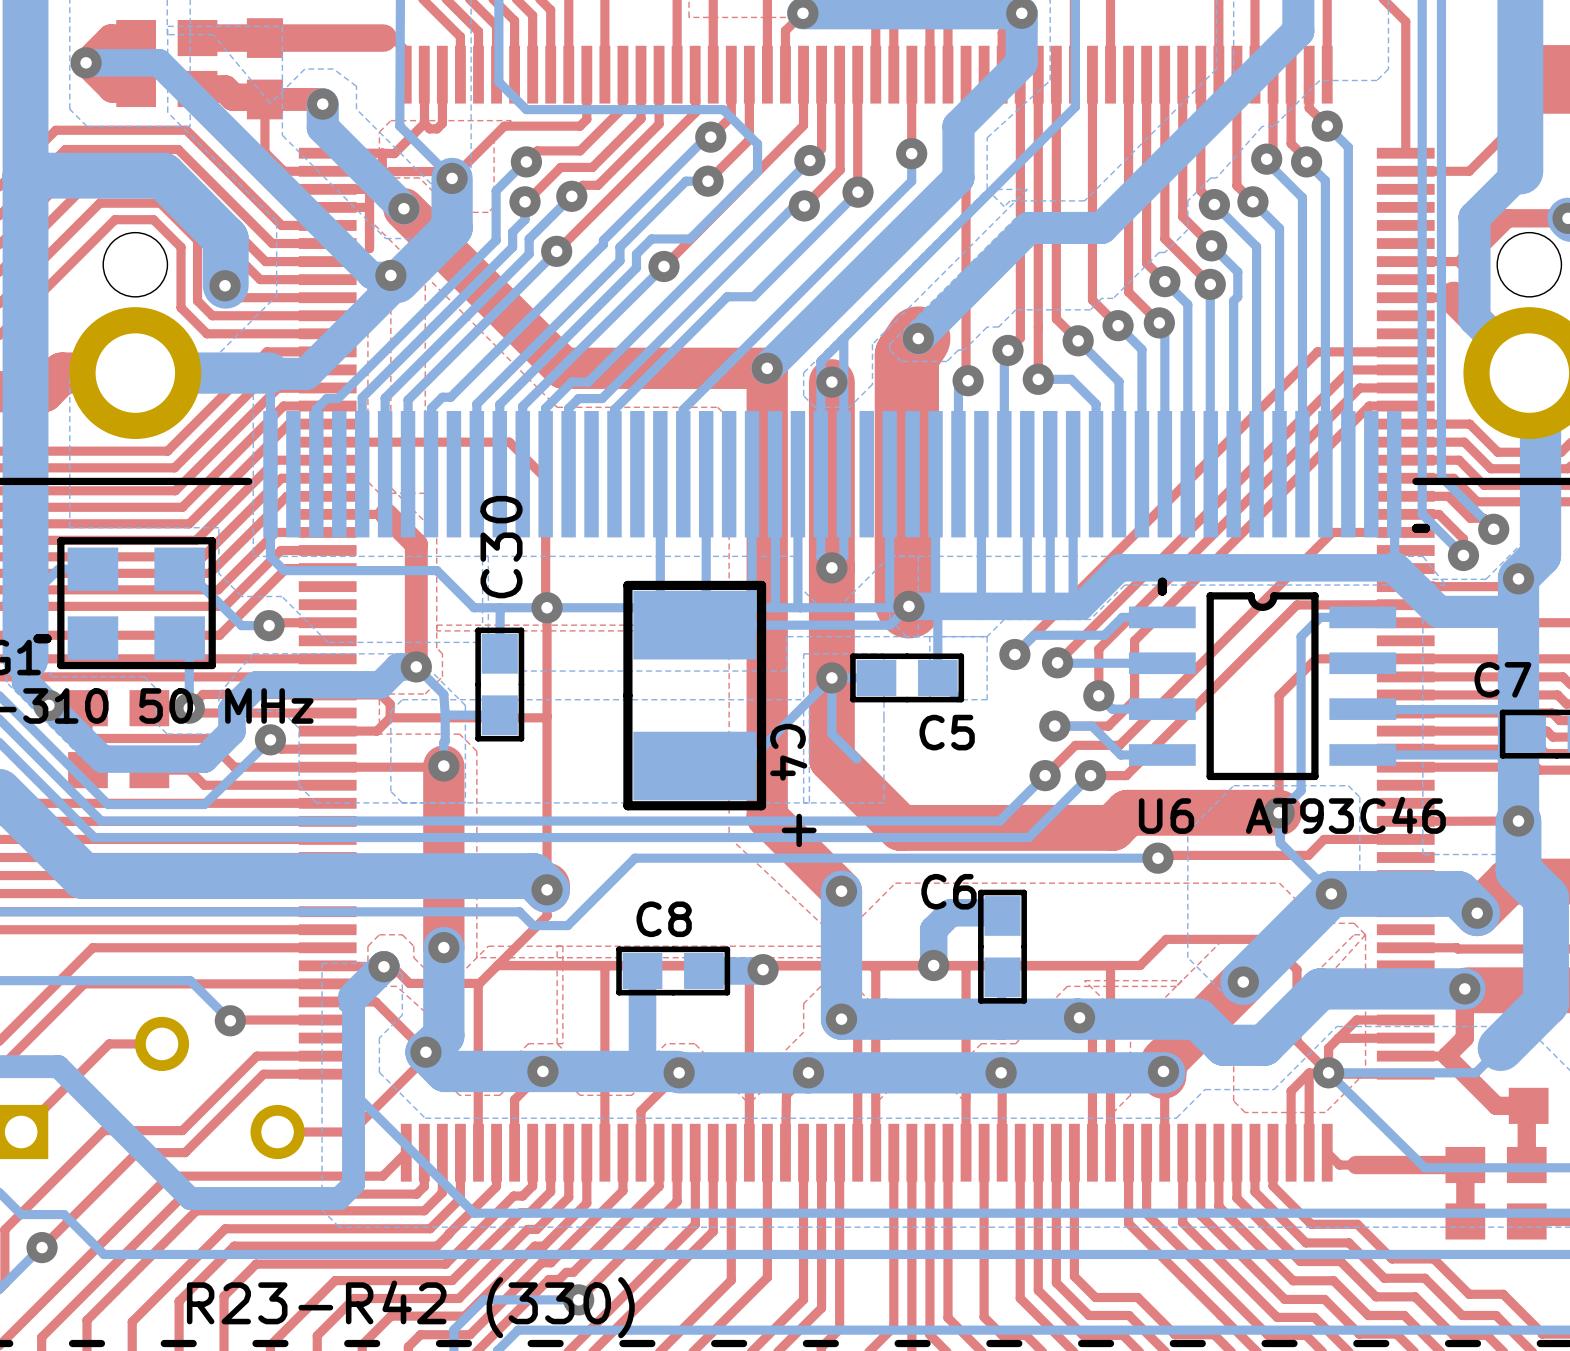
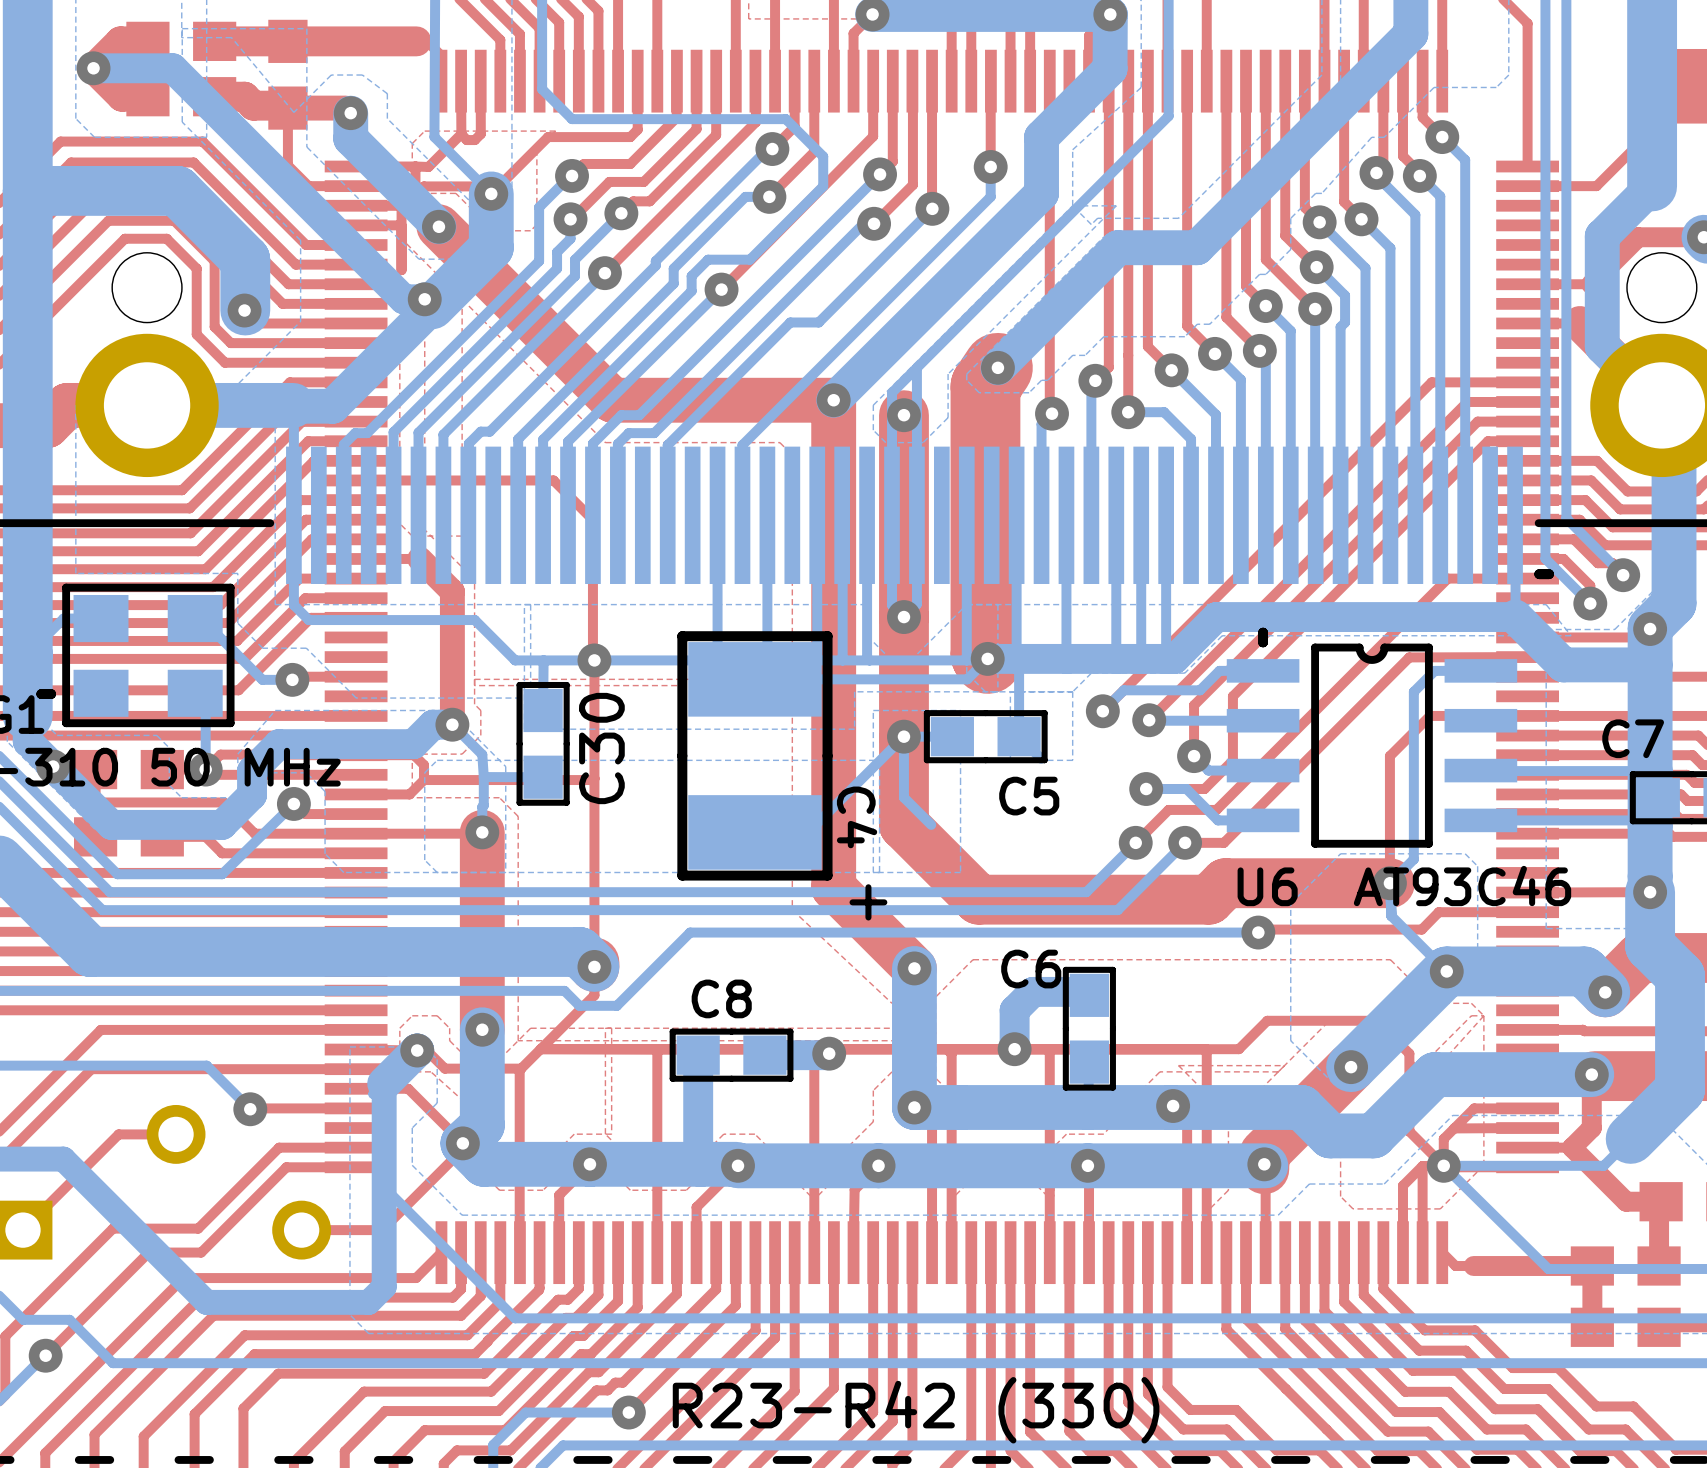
C30 name position: C30 (501, 547) -> C30 (601, 748)
text position: R23-R42 (330) (410, 1307) -> R23-R42 (330) (916, 1410)

